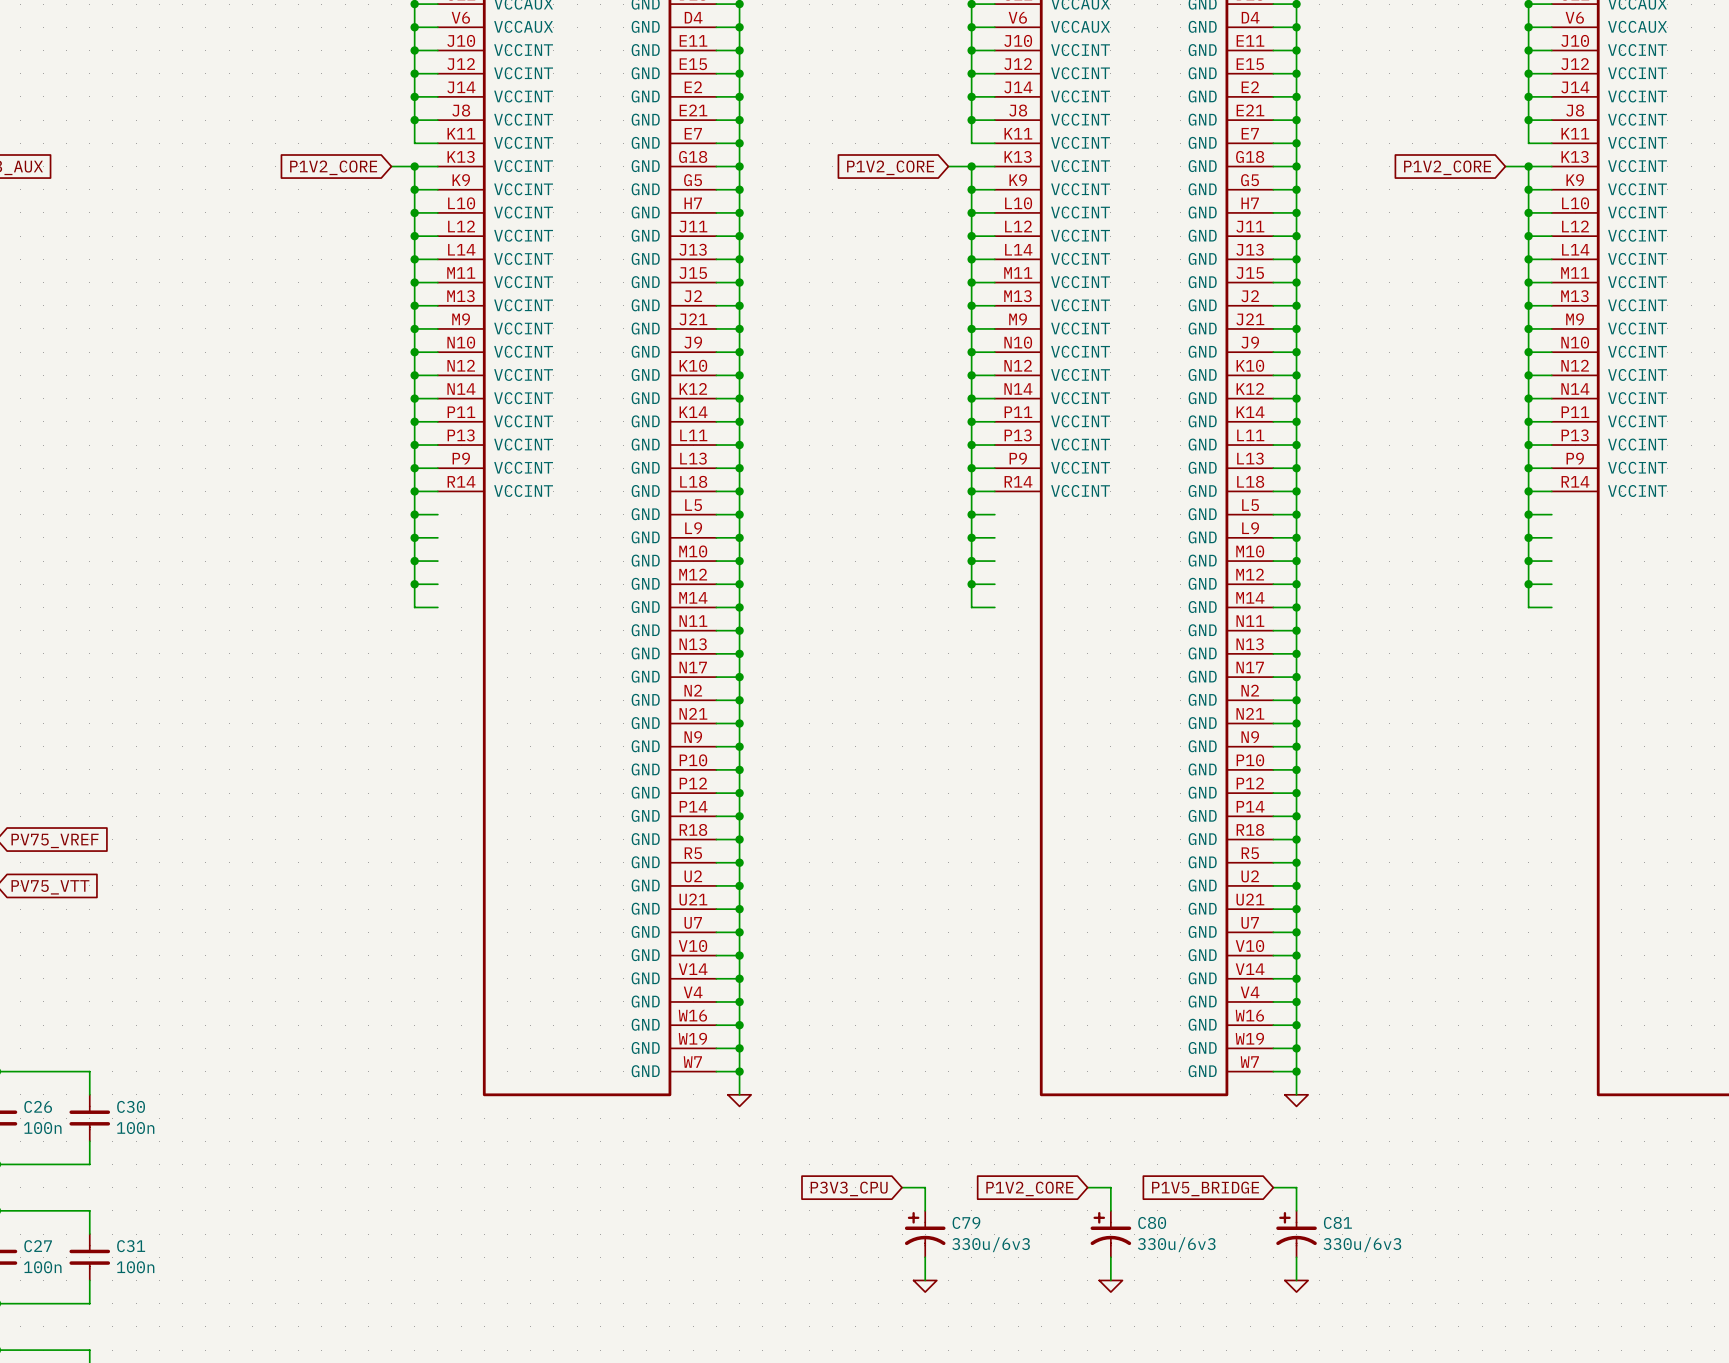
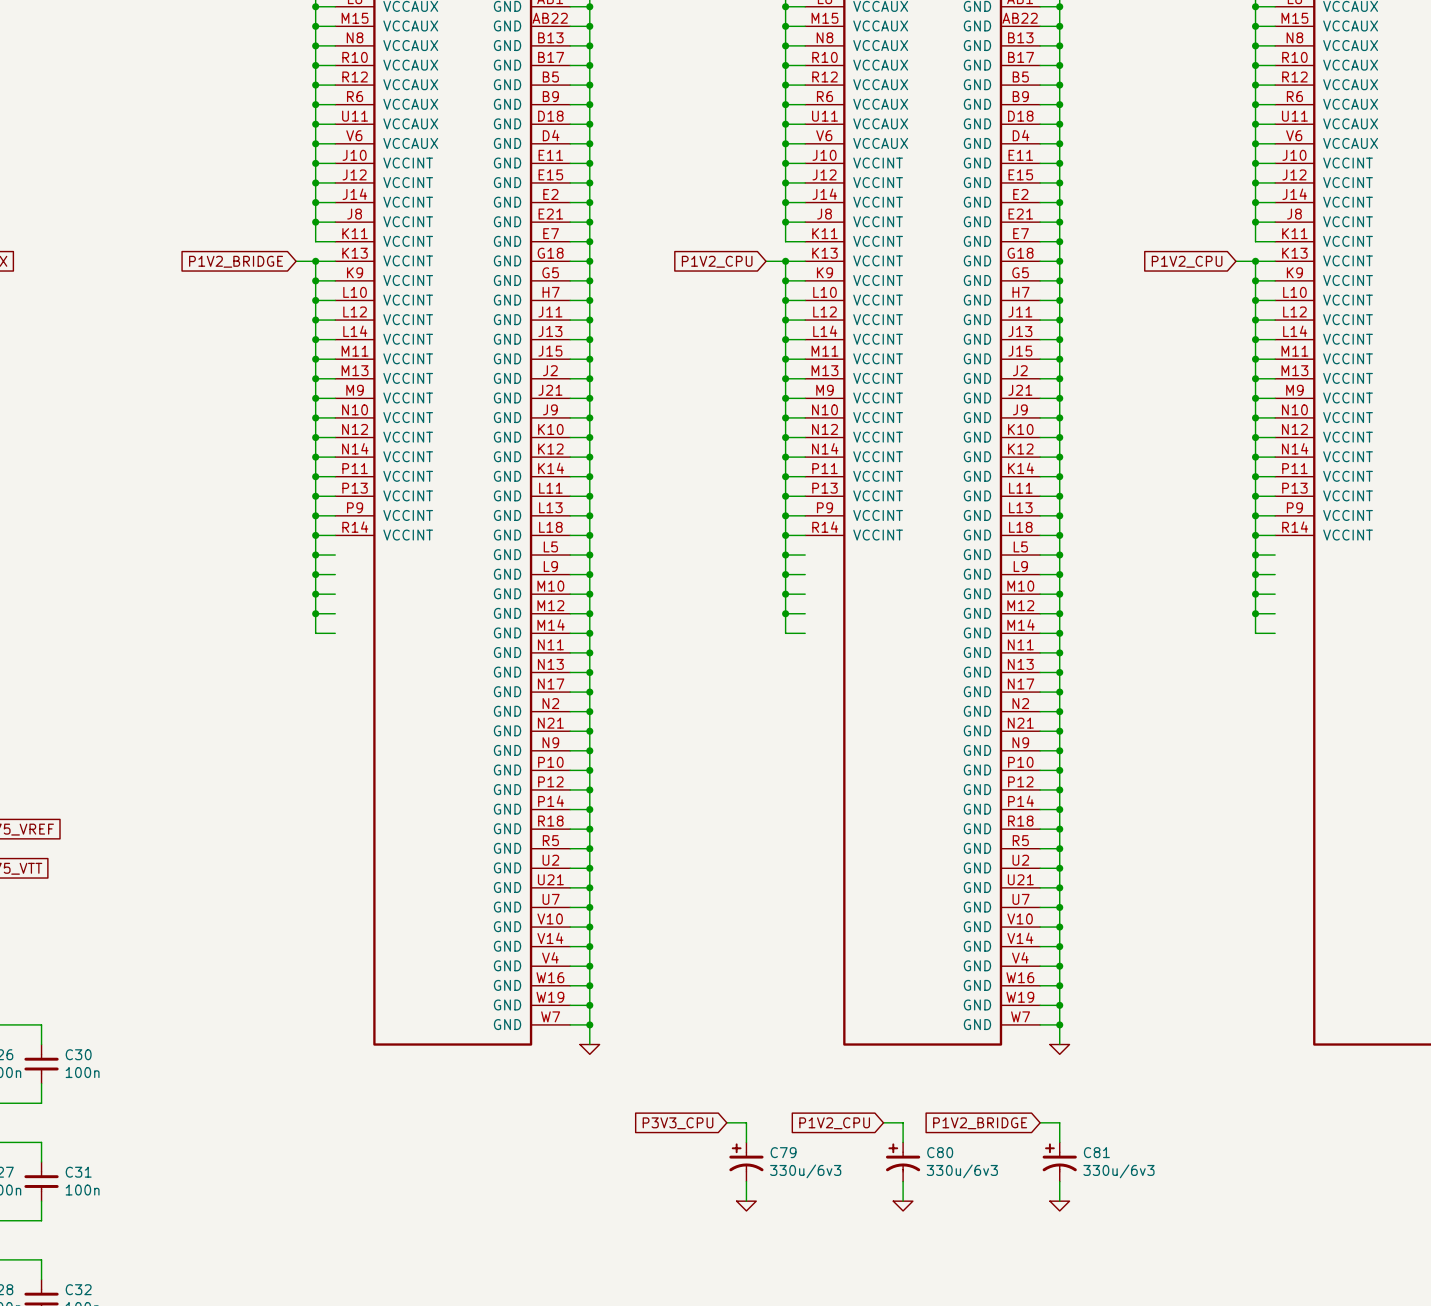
global label: P1V2_CORE (333, 167) -> P1V2_BRIDGE (236, 261)
global label: P1V2_CORE (890, 167) -> P1V2_CPU (717, 261)
global label: P1V2_CORE (1447, 167) -> P1V2_CPU (1187, 261)
global label: P1V2_CORE (1029, 1188) -> P1V2_CPU (834, 1123)
global label: P1V5_BRIDGE (1205, 1188) -> P1V2_BRIDGE (980, 1123)

